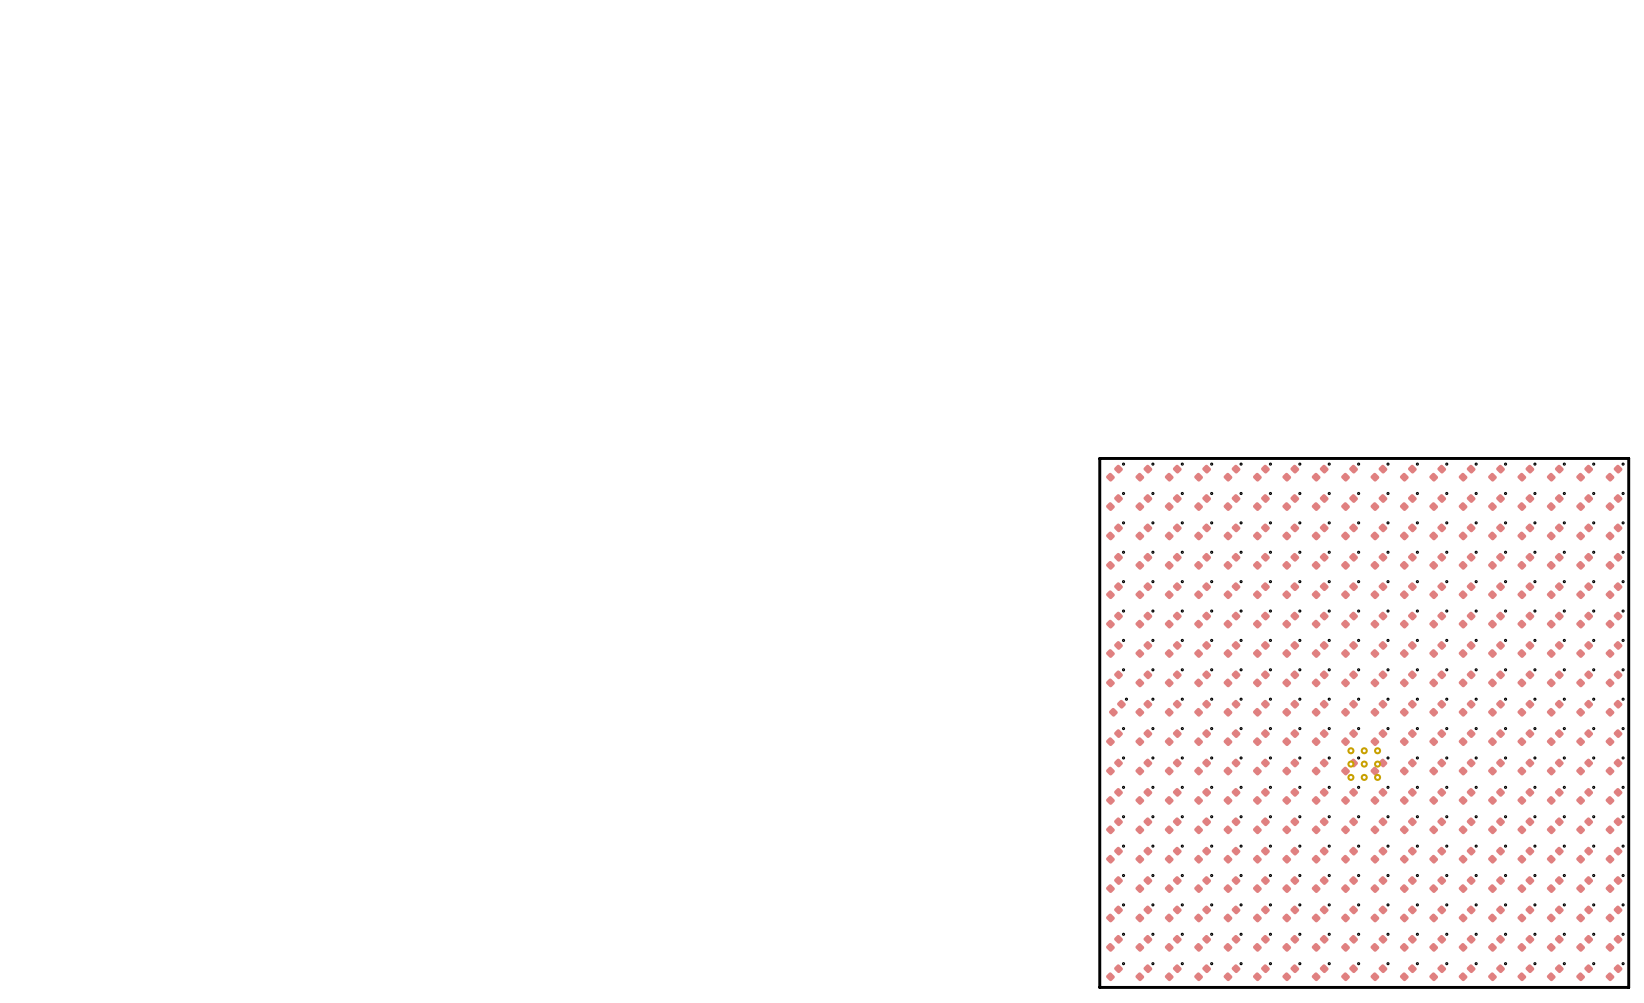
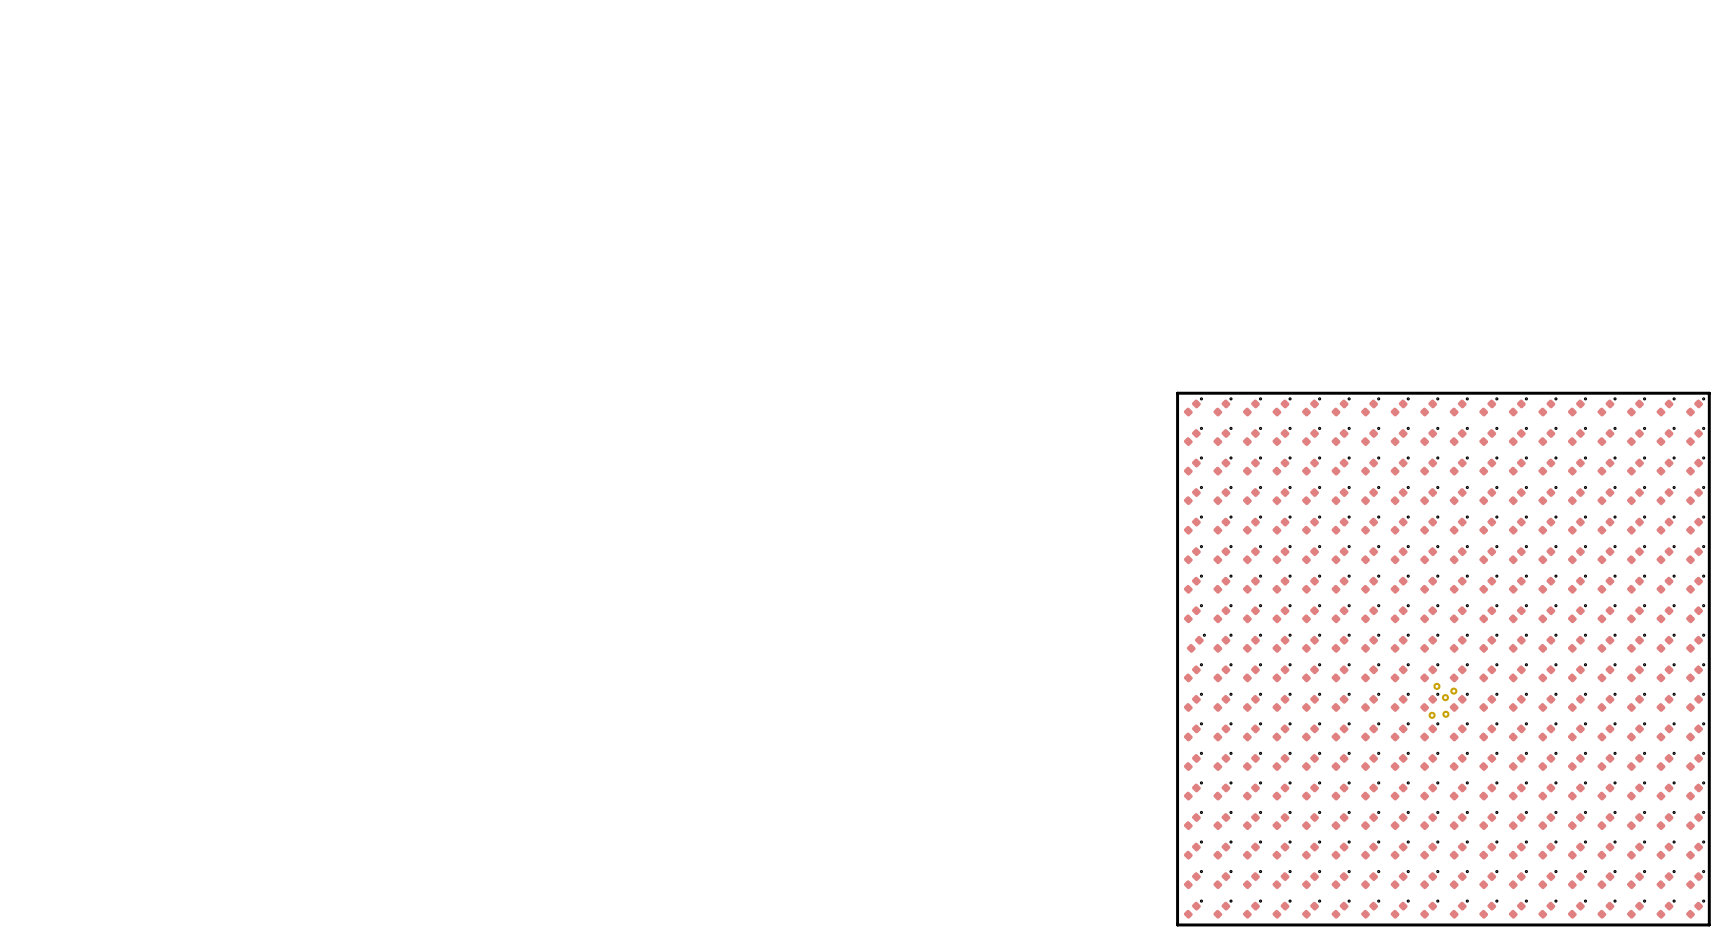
part footprint: [1347, 747, 1382, 781] -> [1428, 682, 1458, 719]

